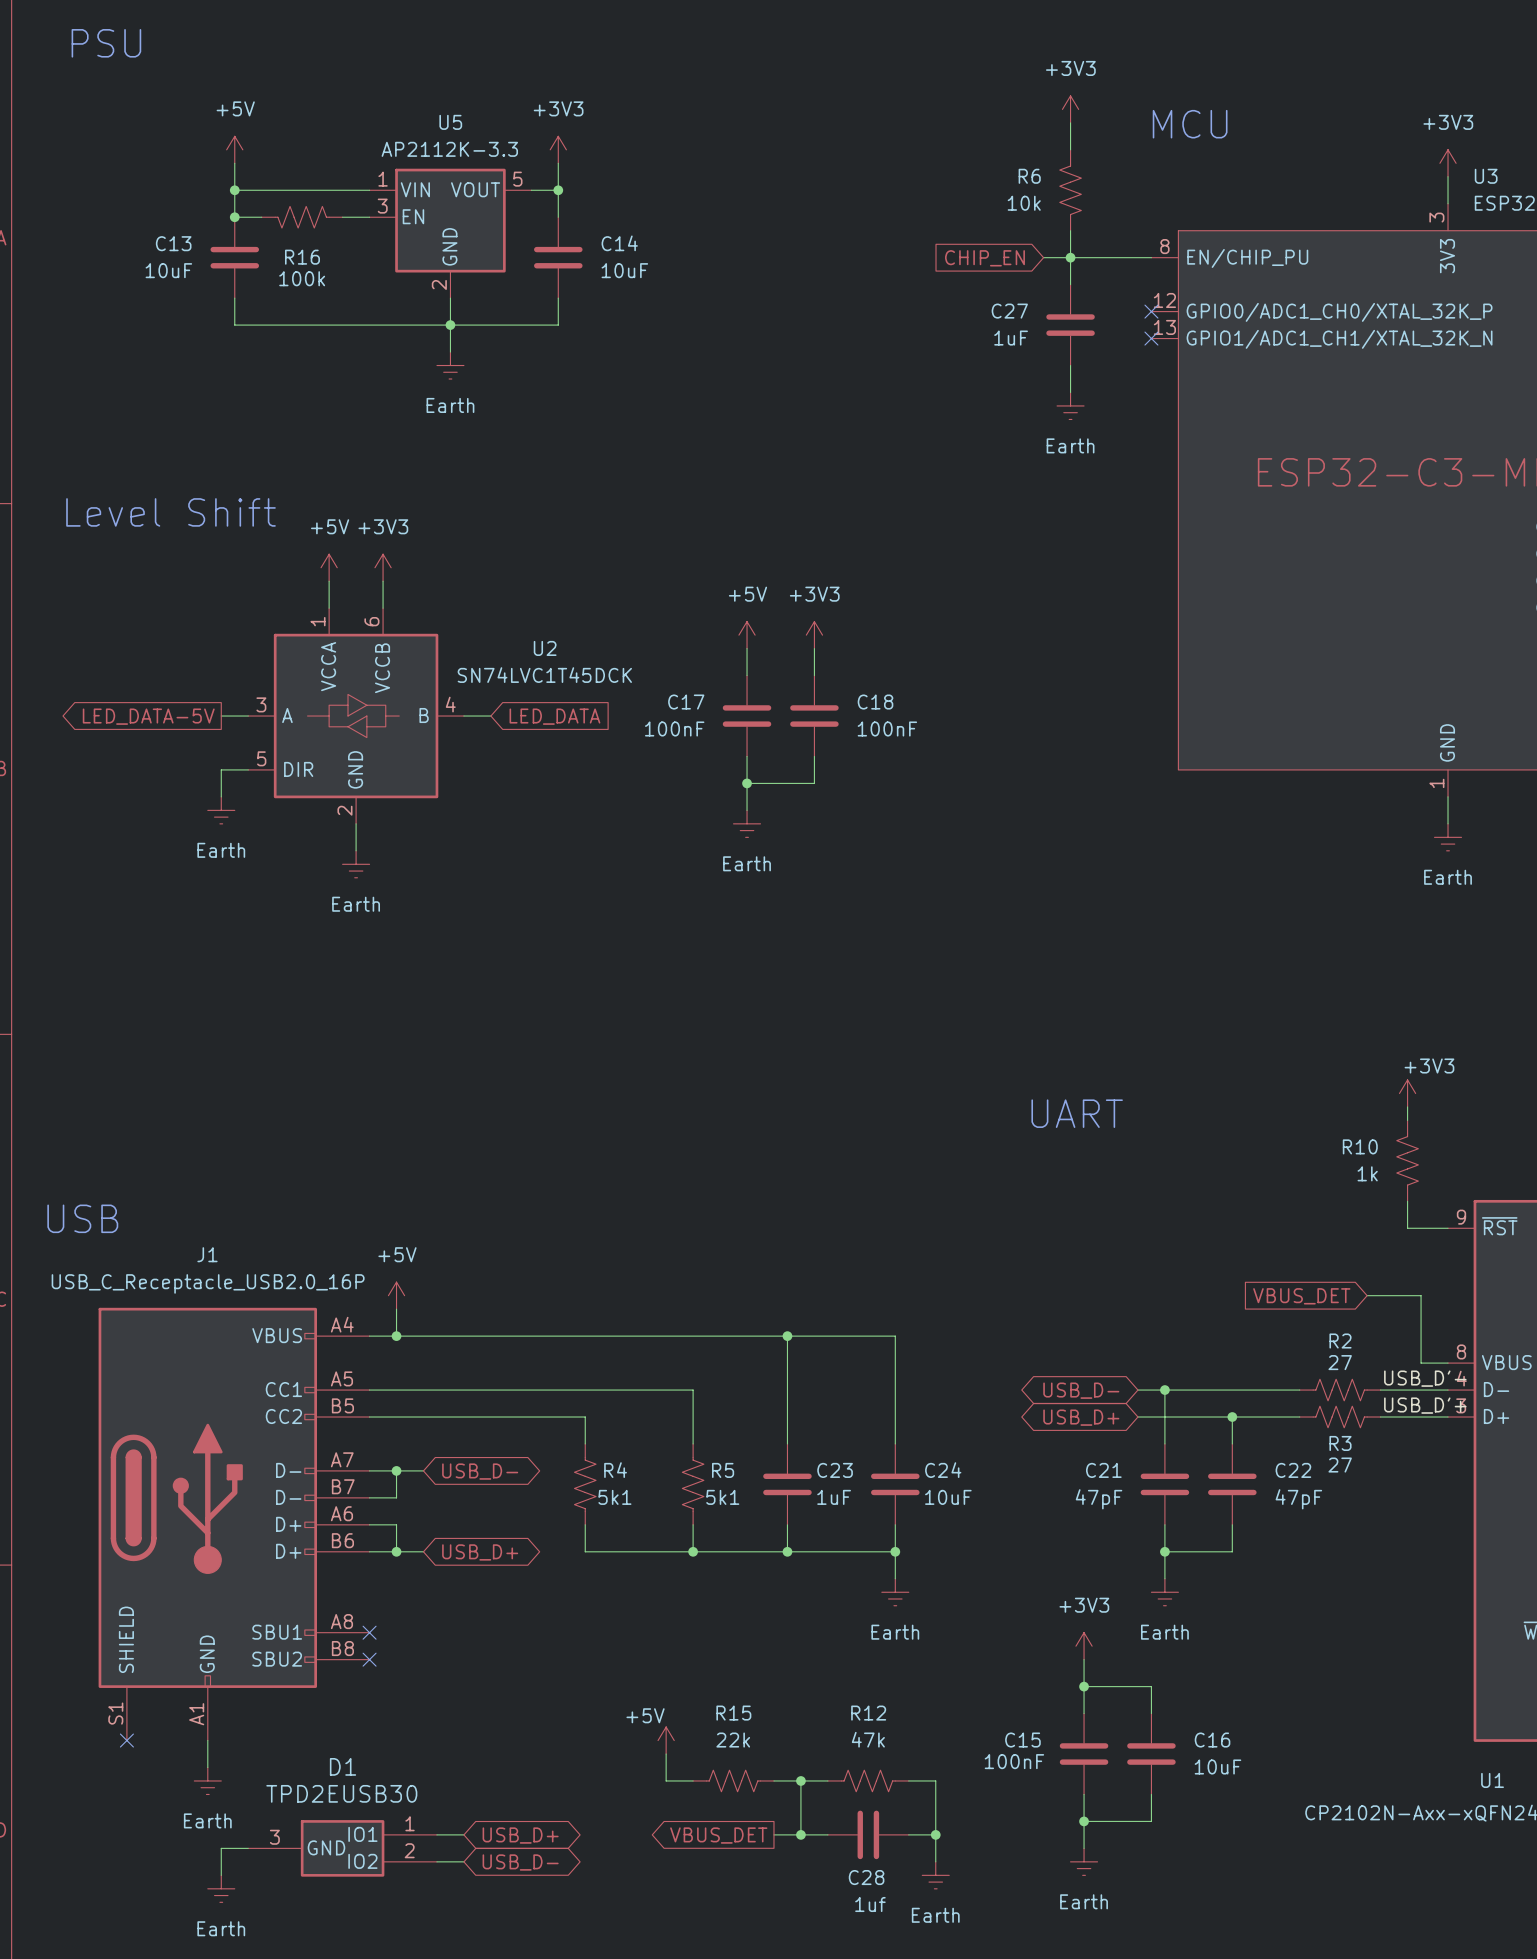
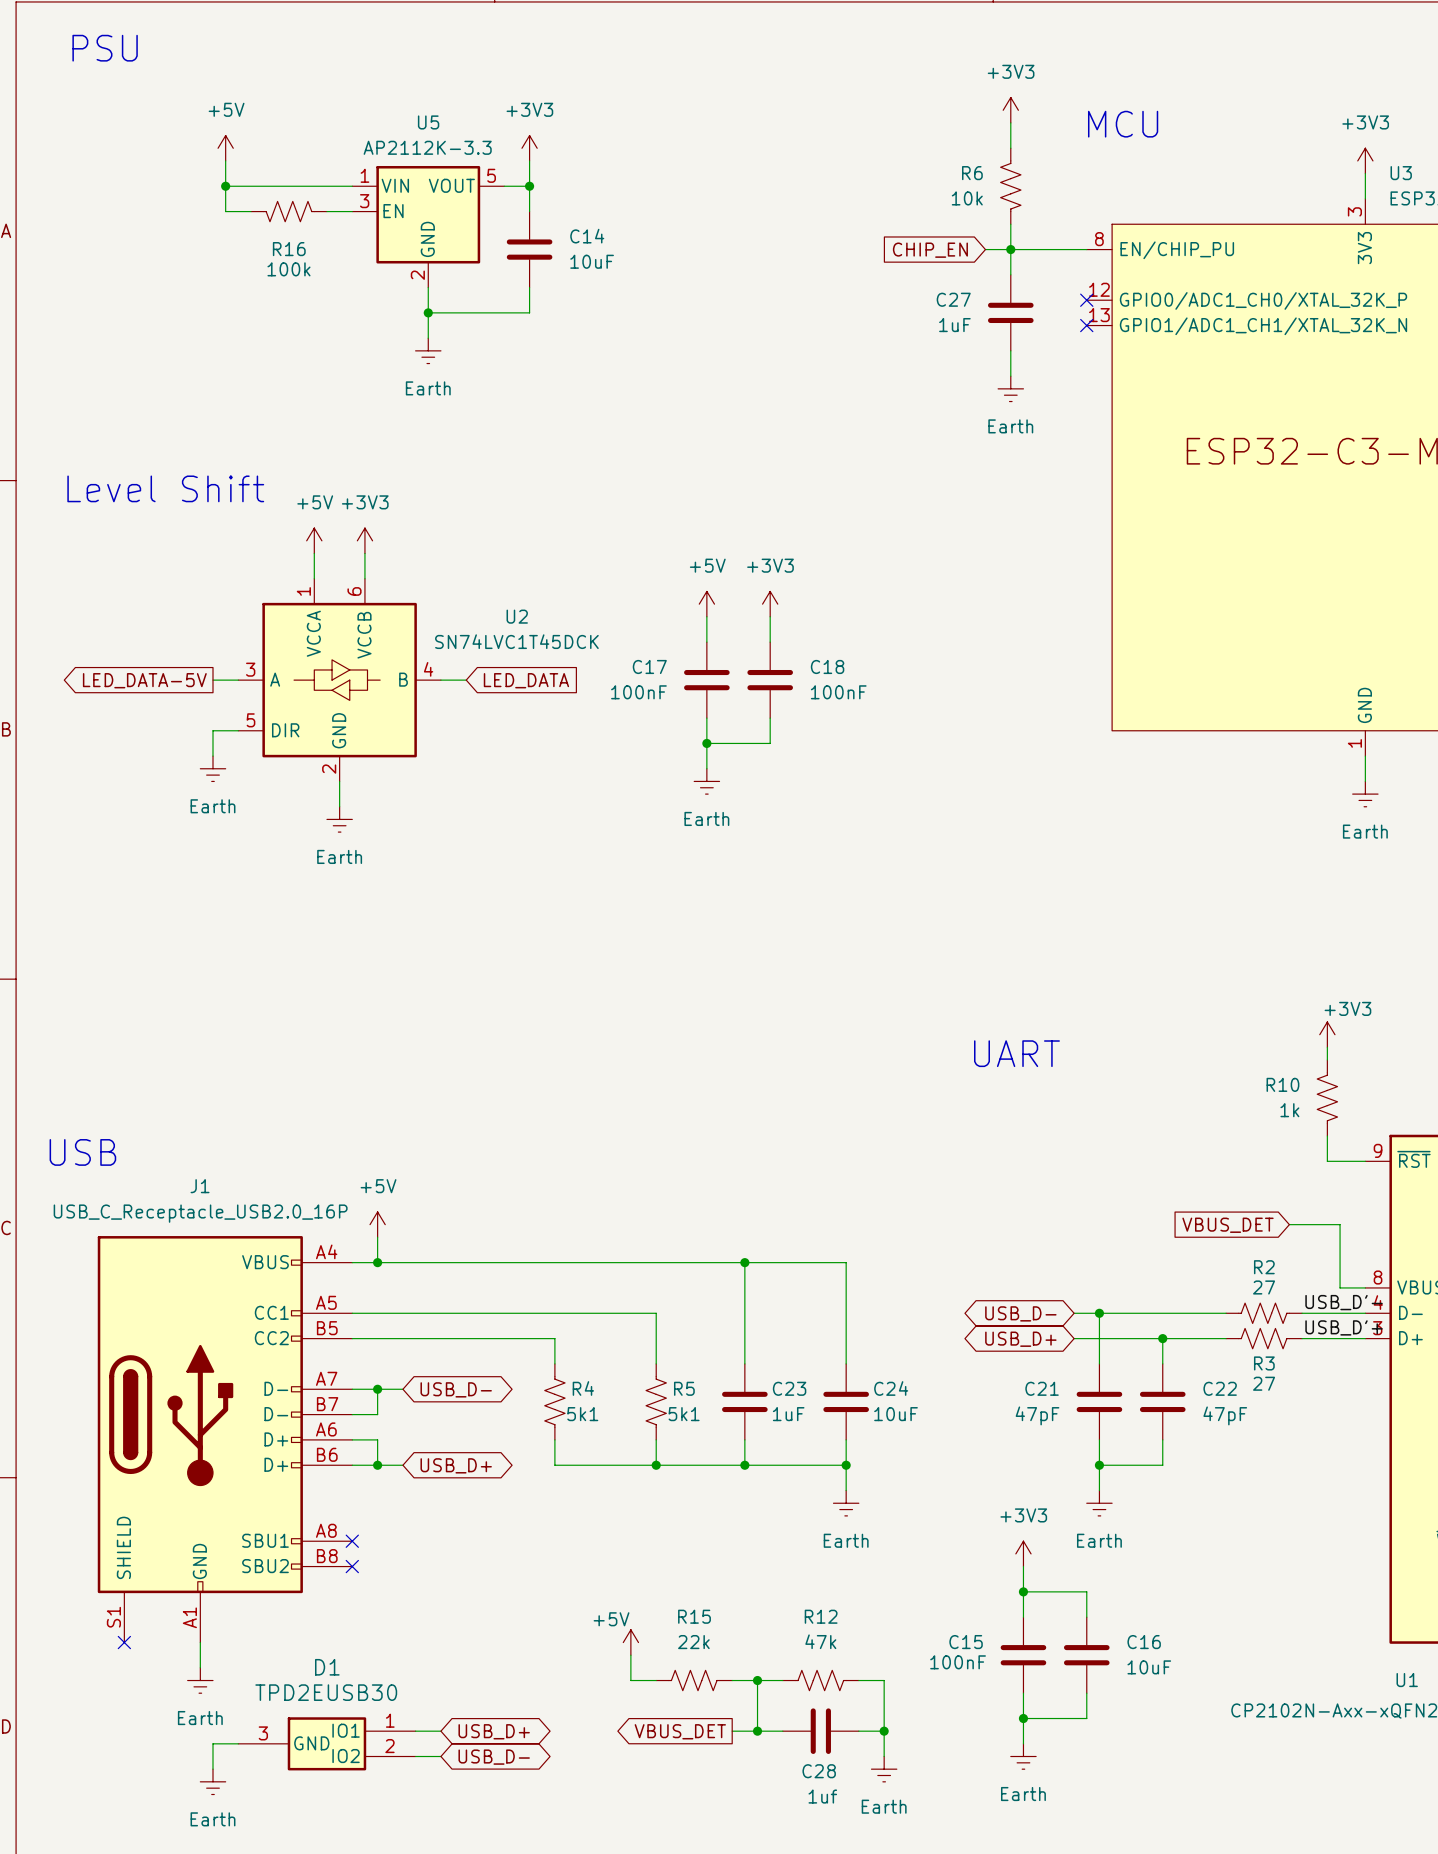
junction: (234, 217) -> none
C13: 10uF (234, 257) -> none
wire: (234, 298) (234, 325) (450, 325) -> none

